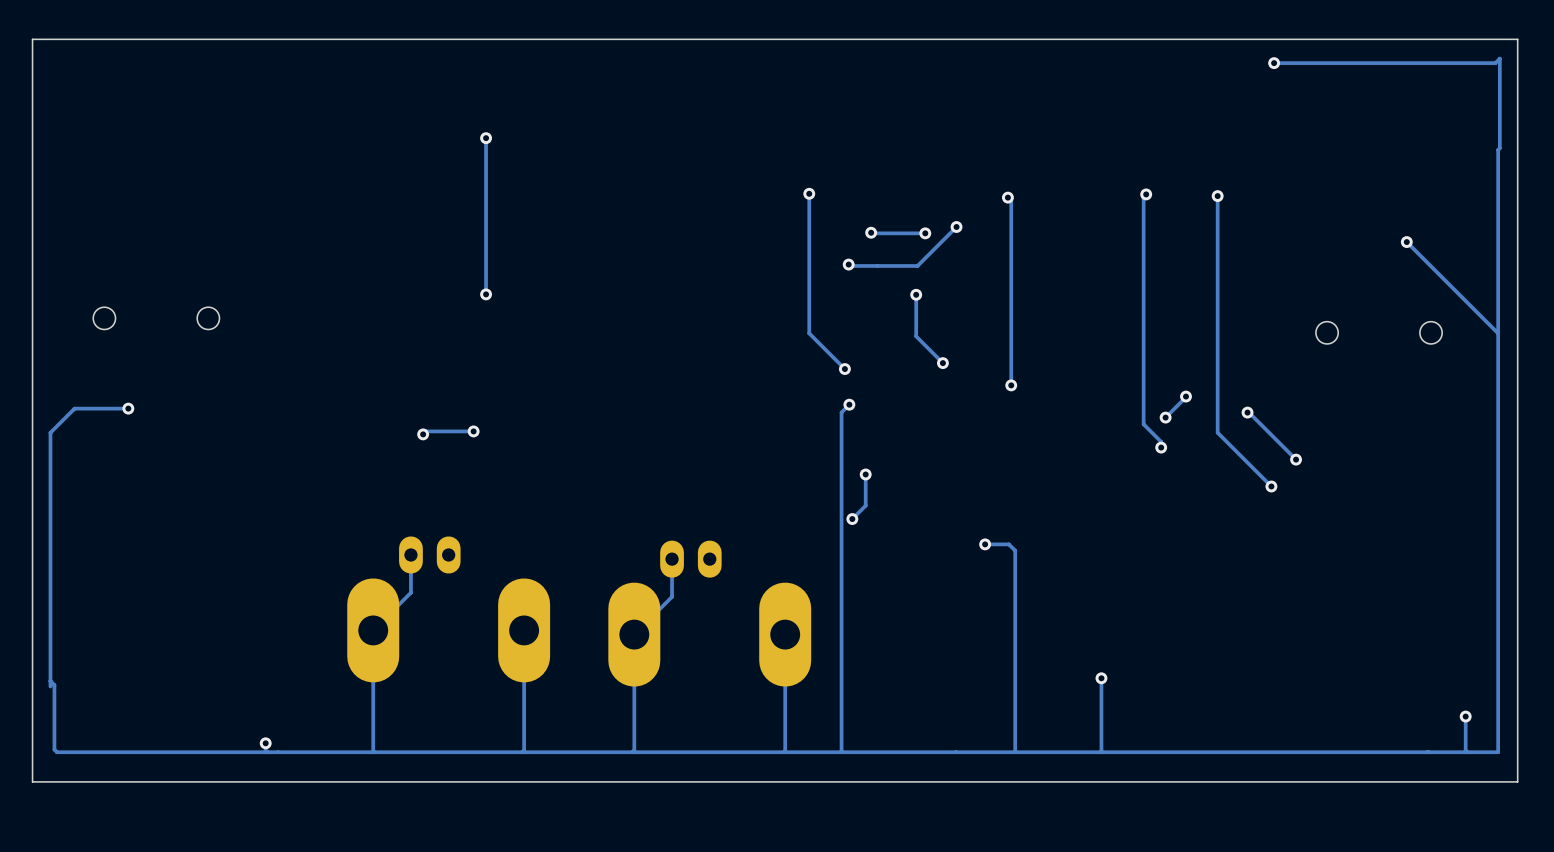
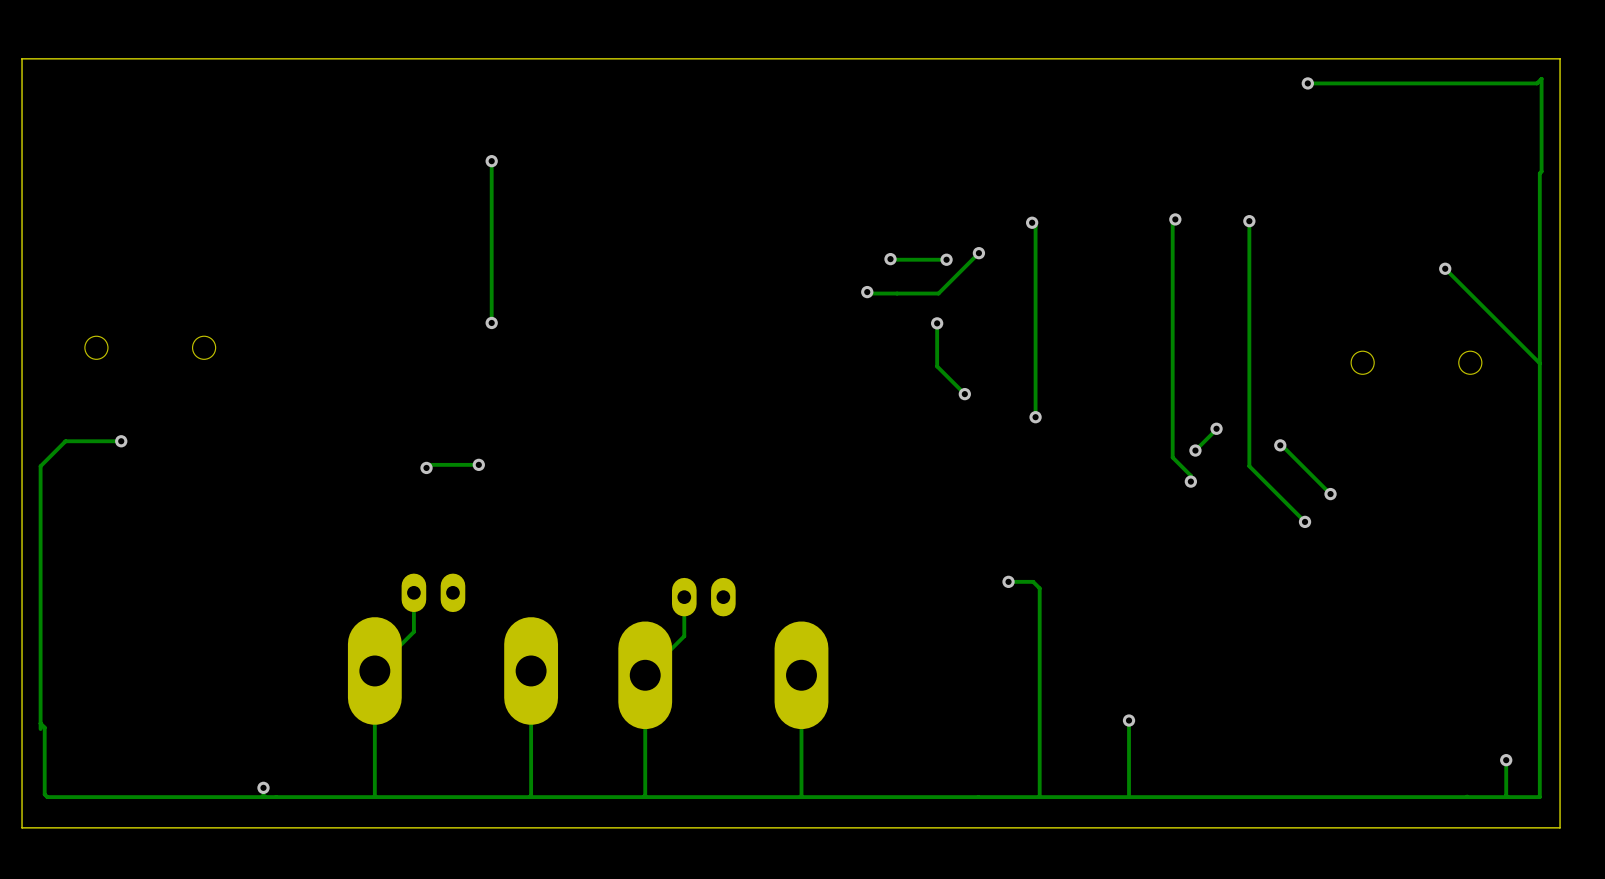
track: (809, 193) (809, 333) (844, 369) -> none
via: (809, 193) -> none
via: (844, 369) -> none
track: (849, 404) (841, 412) (841, 752) -> none
via: (849, 404) -> none
track: (865, 474) (865, 505) (852, 519) -> none
via: (865, 474) -> none
via: (852, 519) -> none

